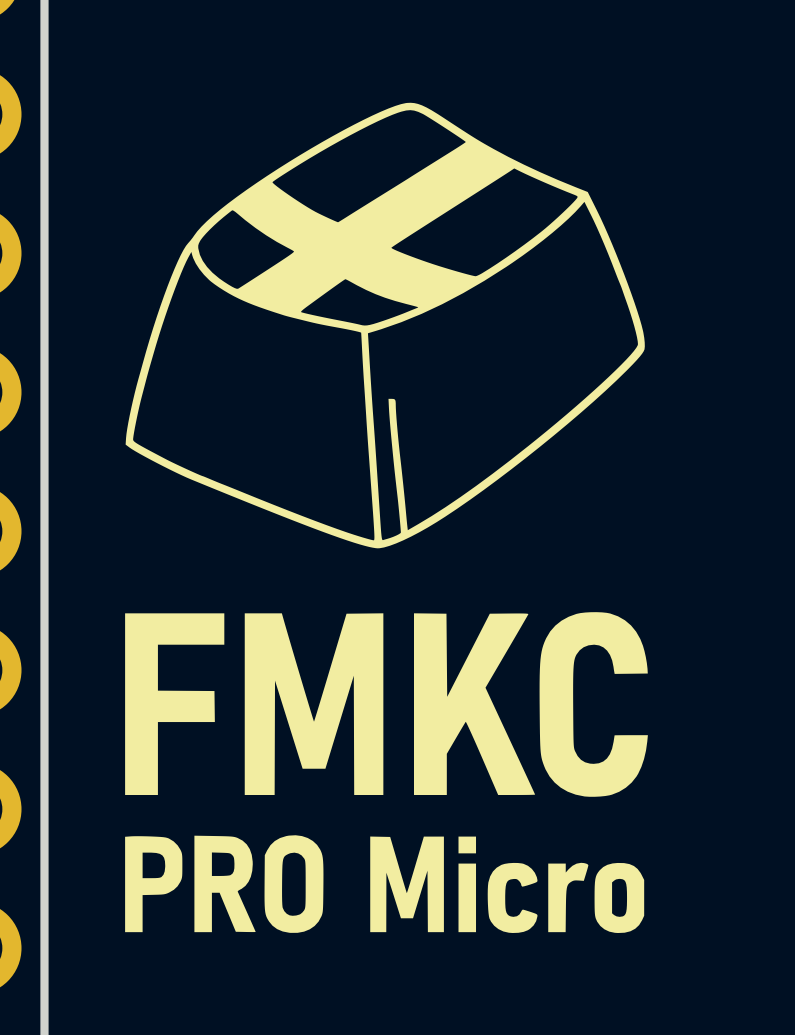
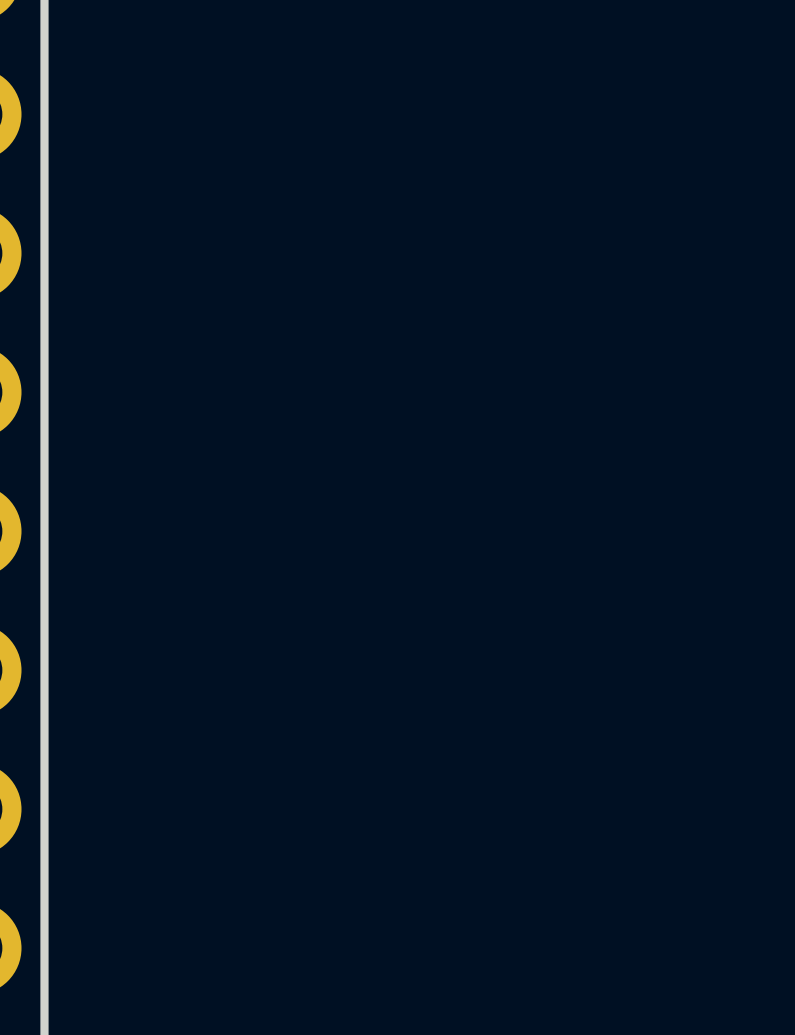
drawing: [125, 102, 648, 934] -> none

